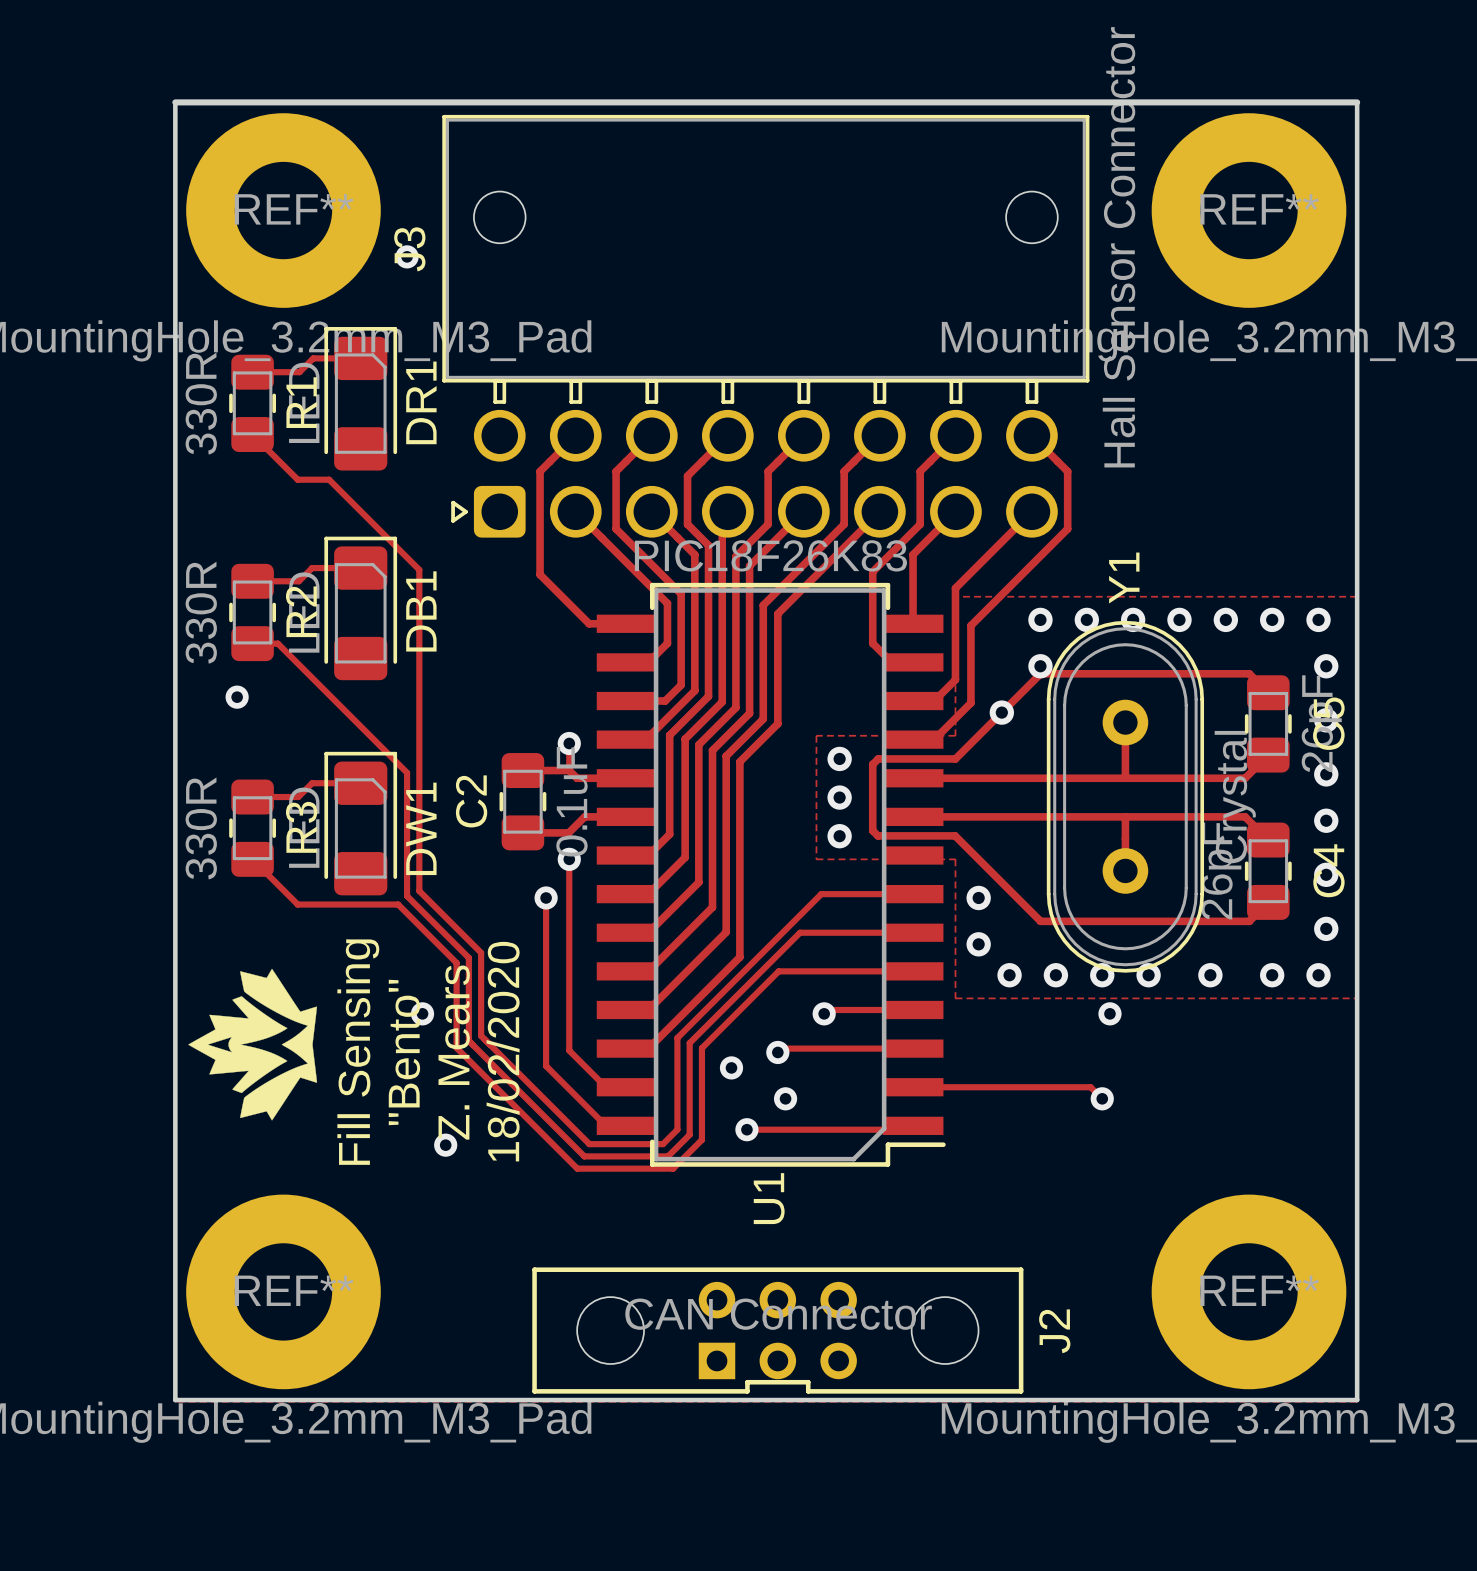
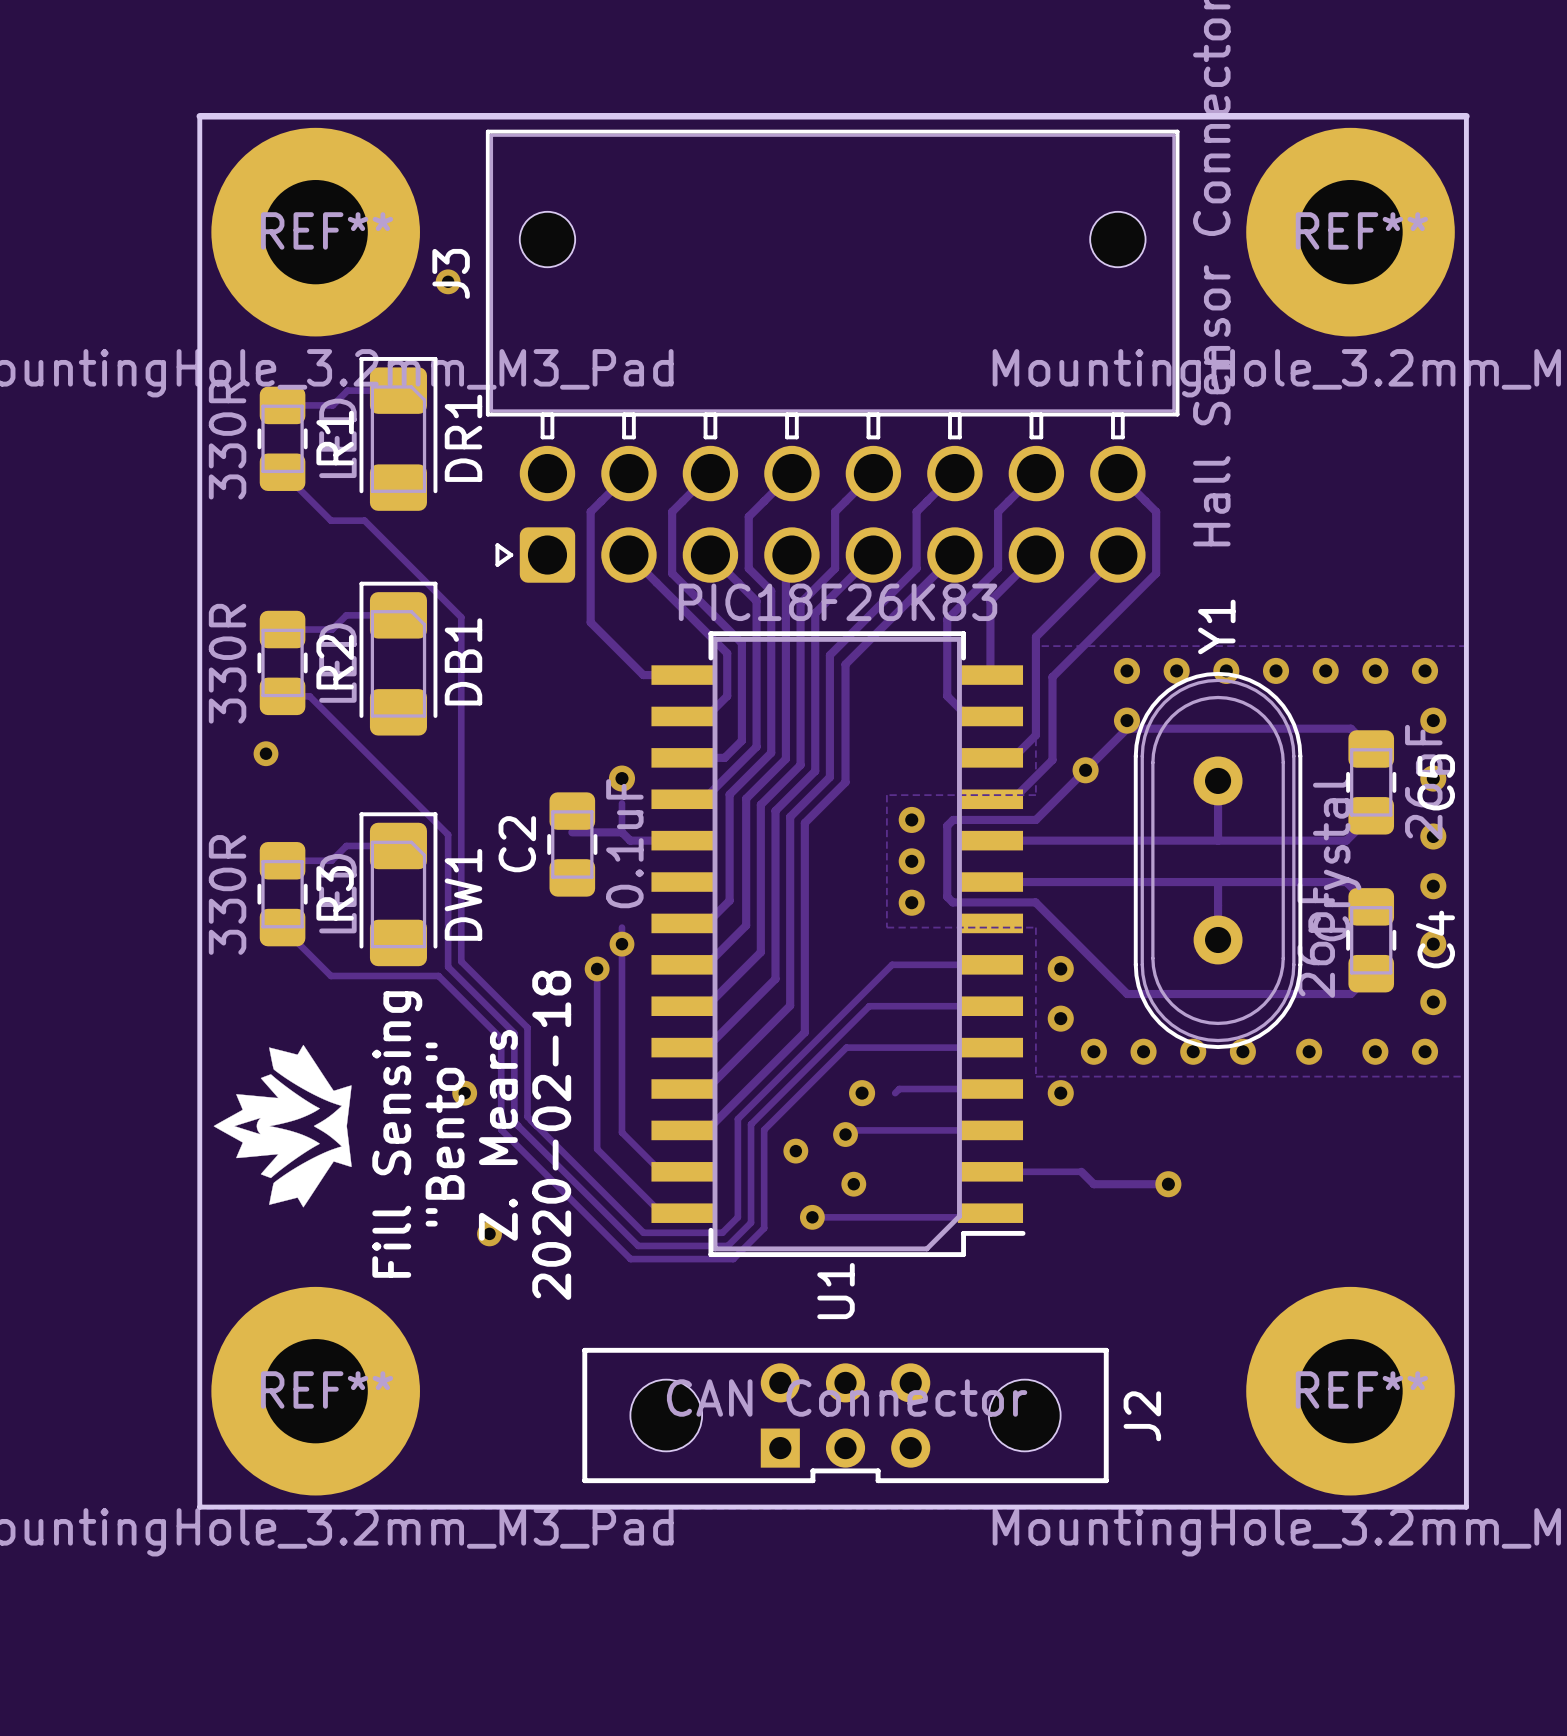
via position: (569, 743) -> (621, 778)
C2 position: (522, 801) -> (572, 844)
track: (627, 816) (584, 816) (568, 832) (522, 832) -> none
via position: (569, 859) -> (621, 944)
via: none -> (862, 1093)
via: (824, 1013) -> none
via: none -> (1060, 1093)
via: (1109, 1013) -> none
text: 18/02/2020 (503, 1051) -> 2020-02-18 (551, 1135)
track: (997, 1087) (1090, 1087) (1102, 1098) -> (1081, 1171) (1093, 1184) (1168, 1184)
via position: (1102, 1098) -> (1168, 1184)
J2 position: (777, 1330) -> (845, 1415)

